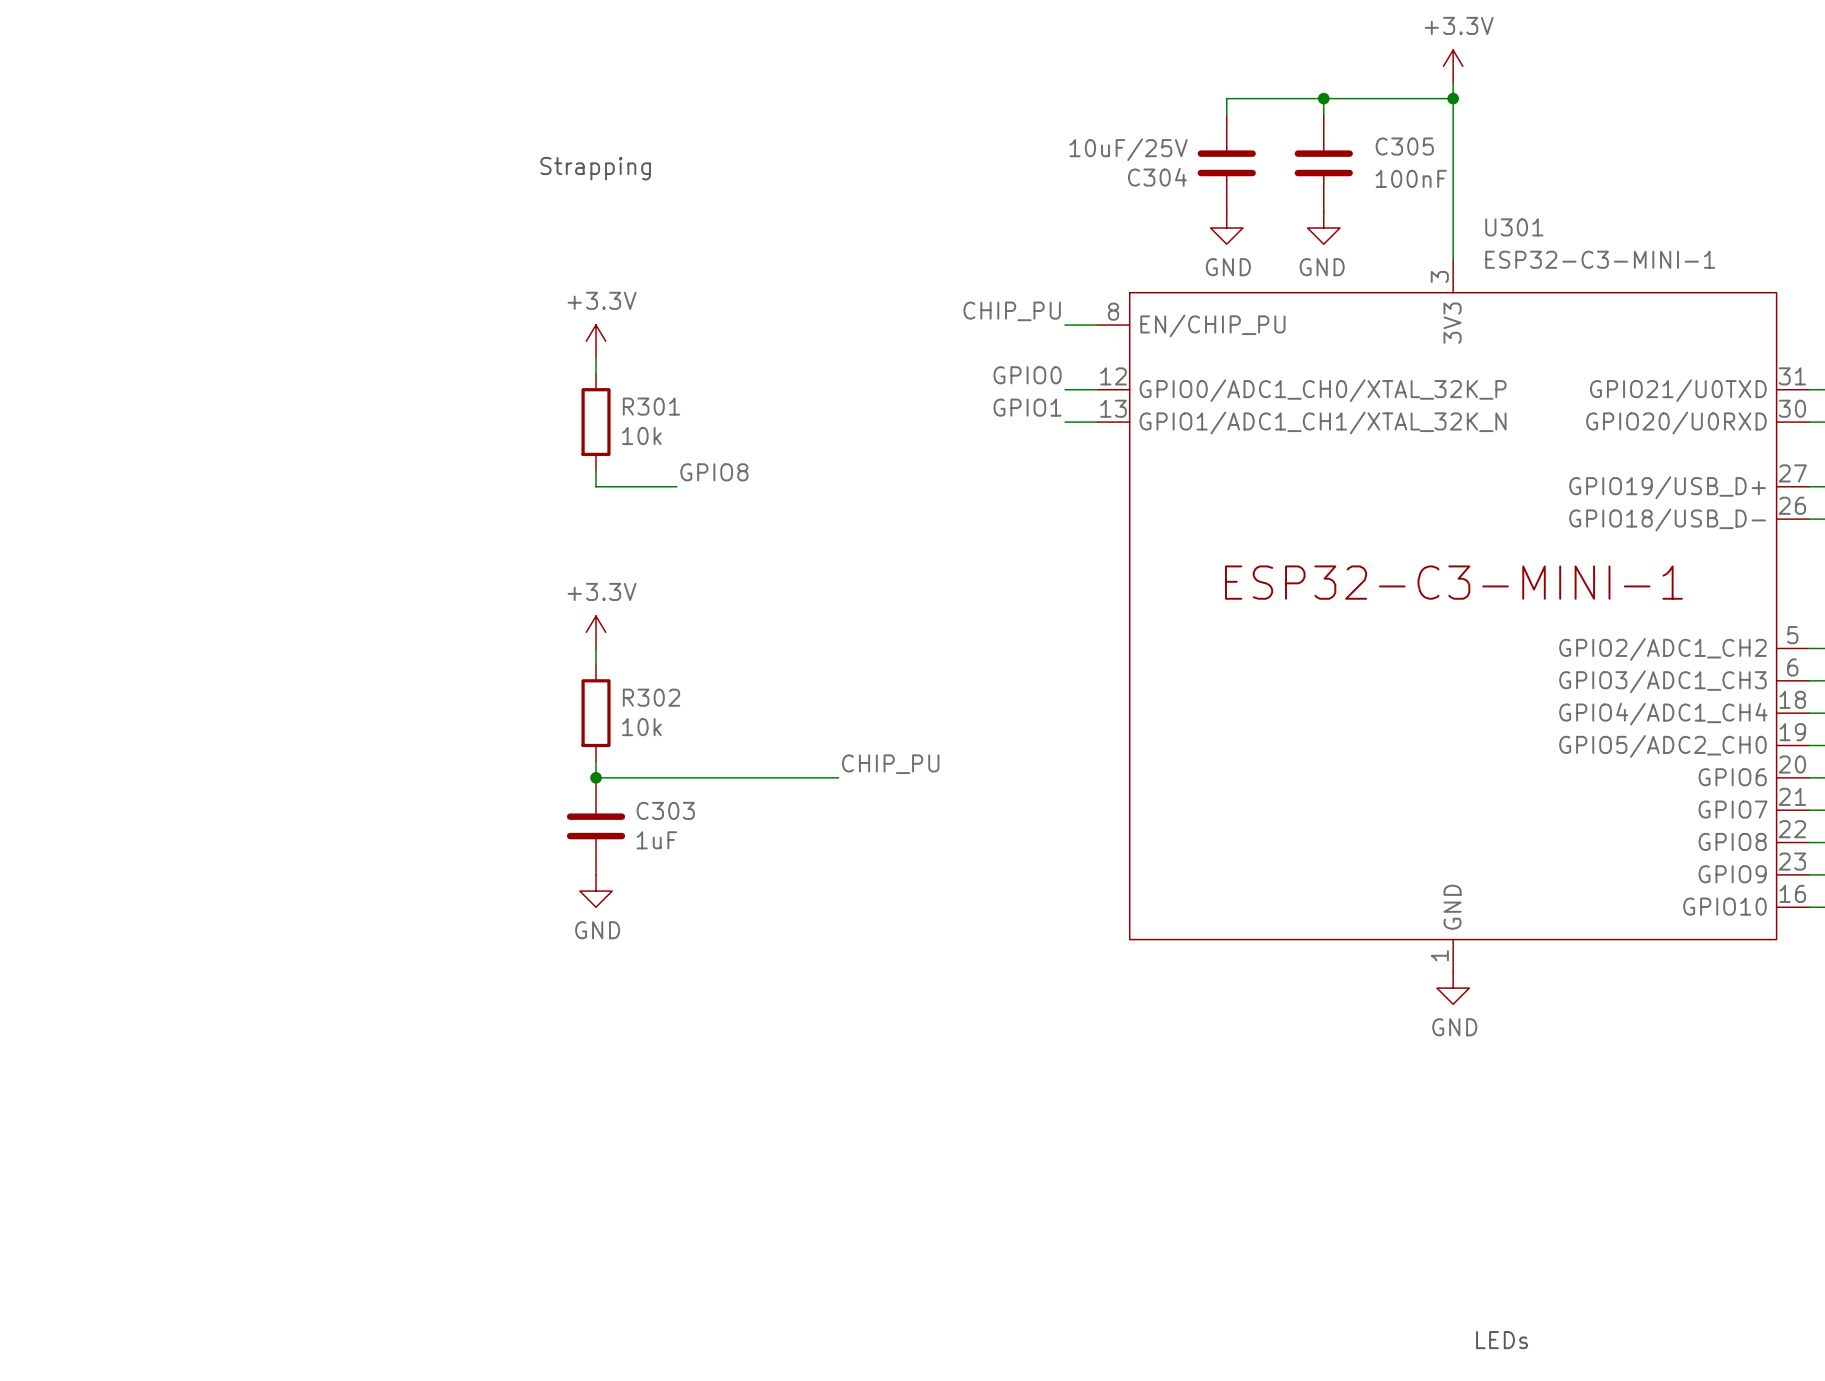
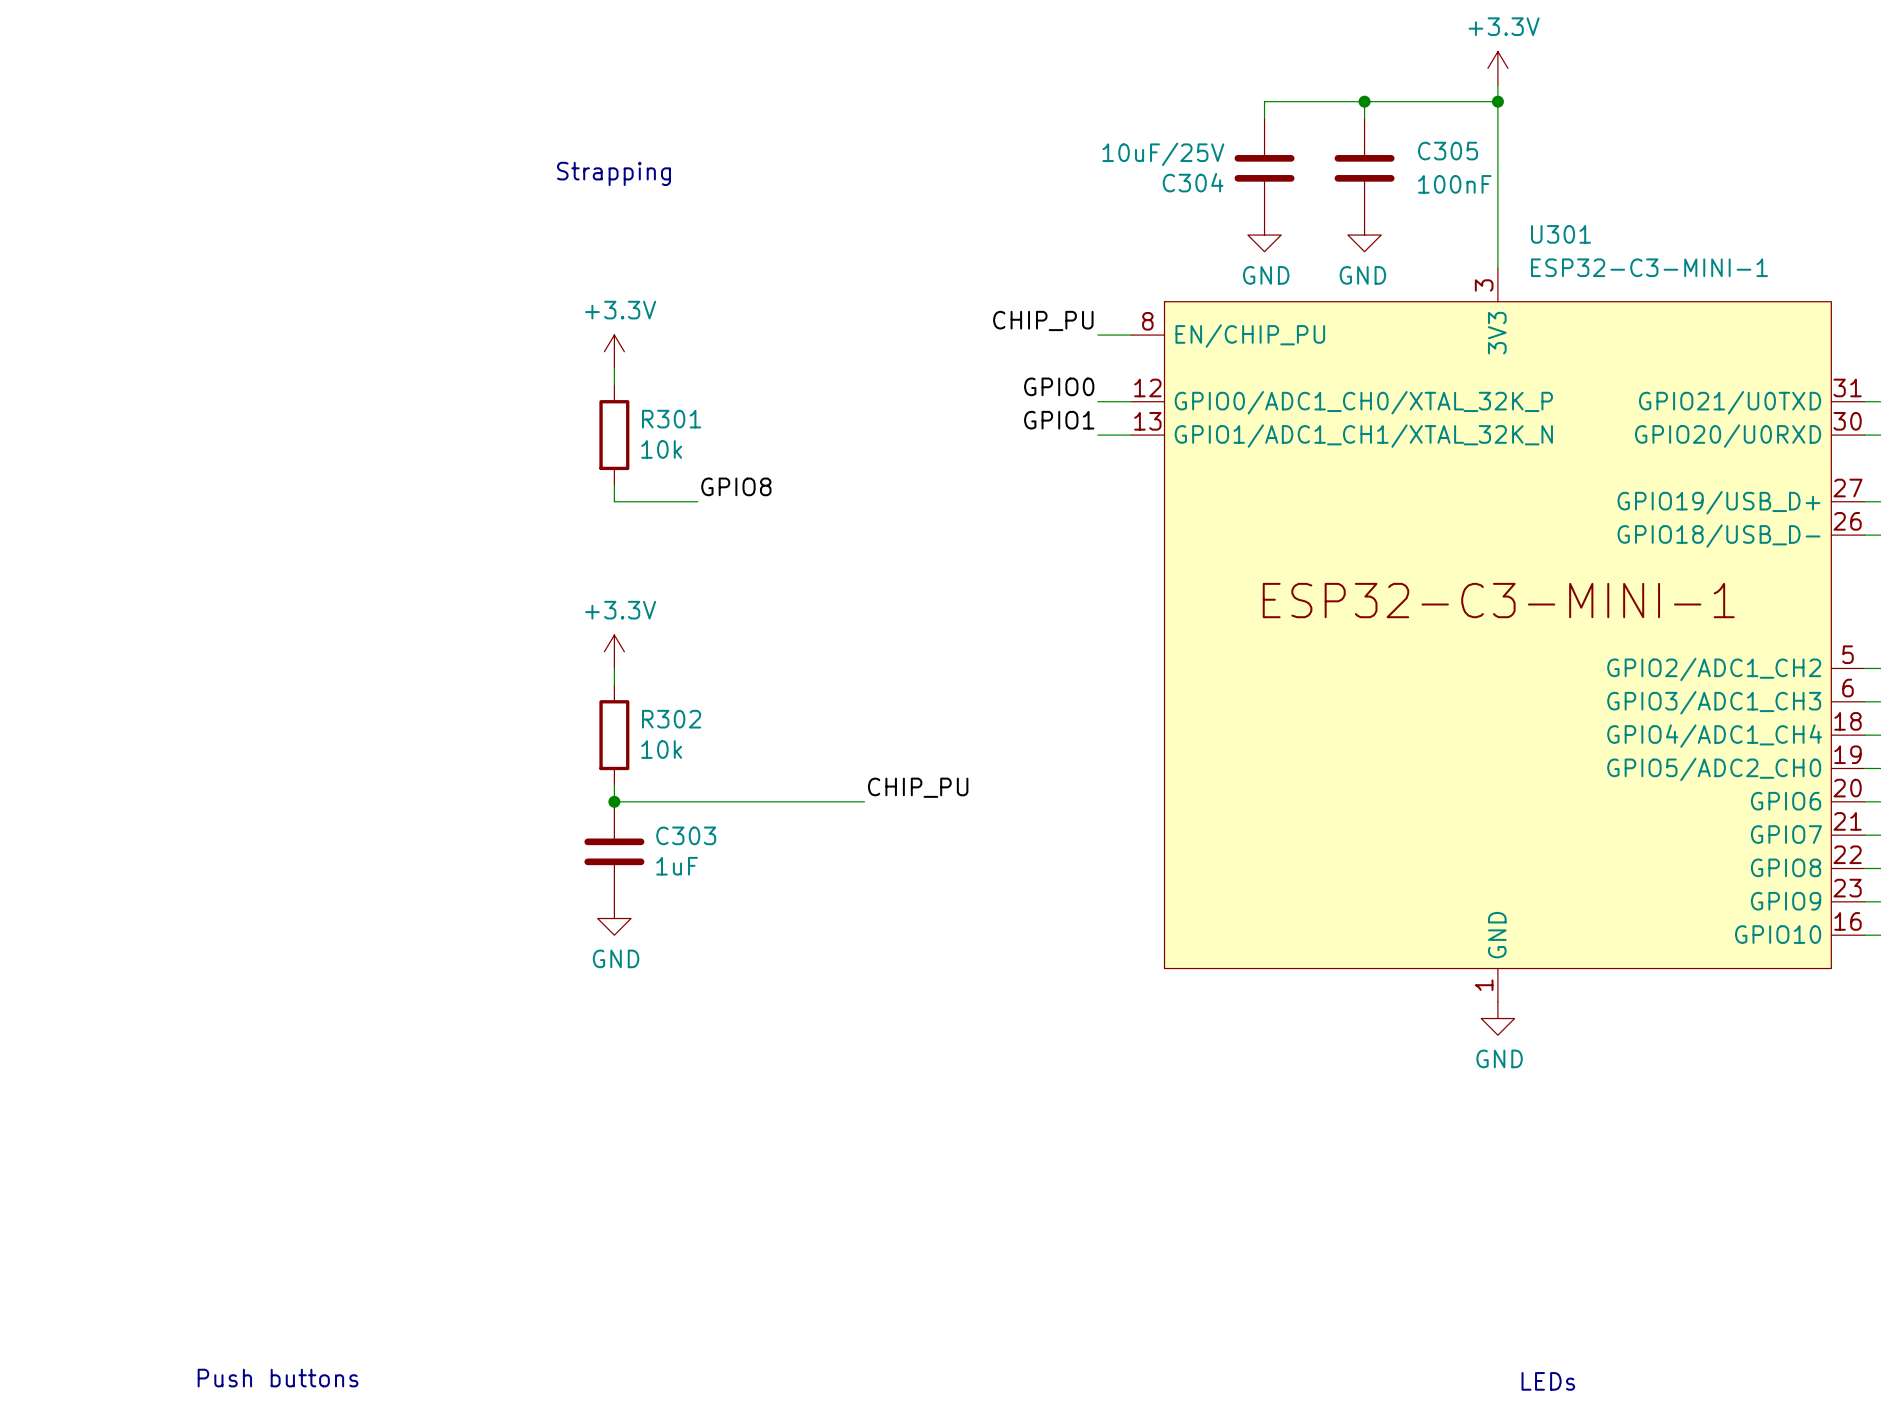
text: none -> Push buttons (278, 1378)

